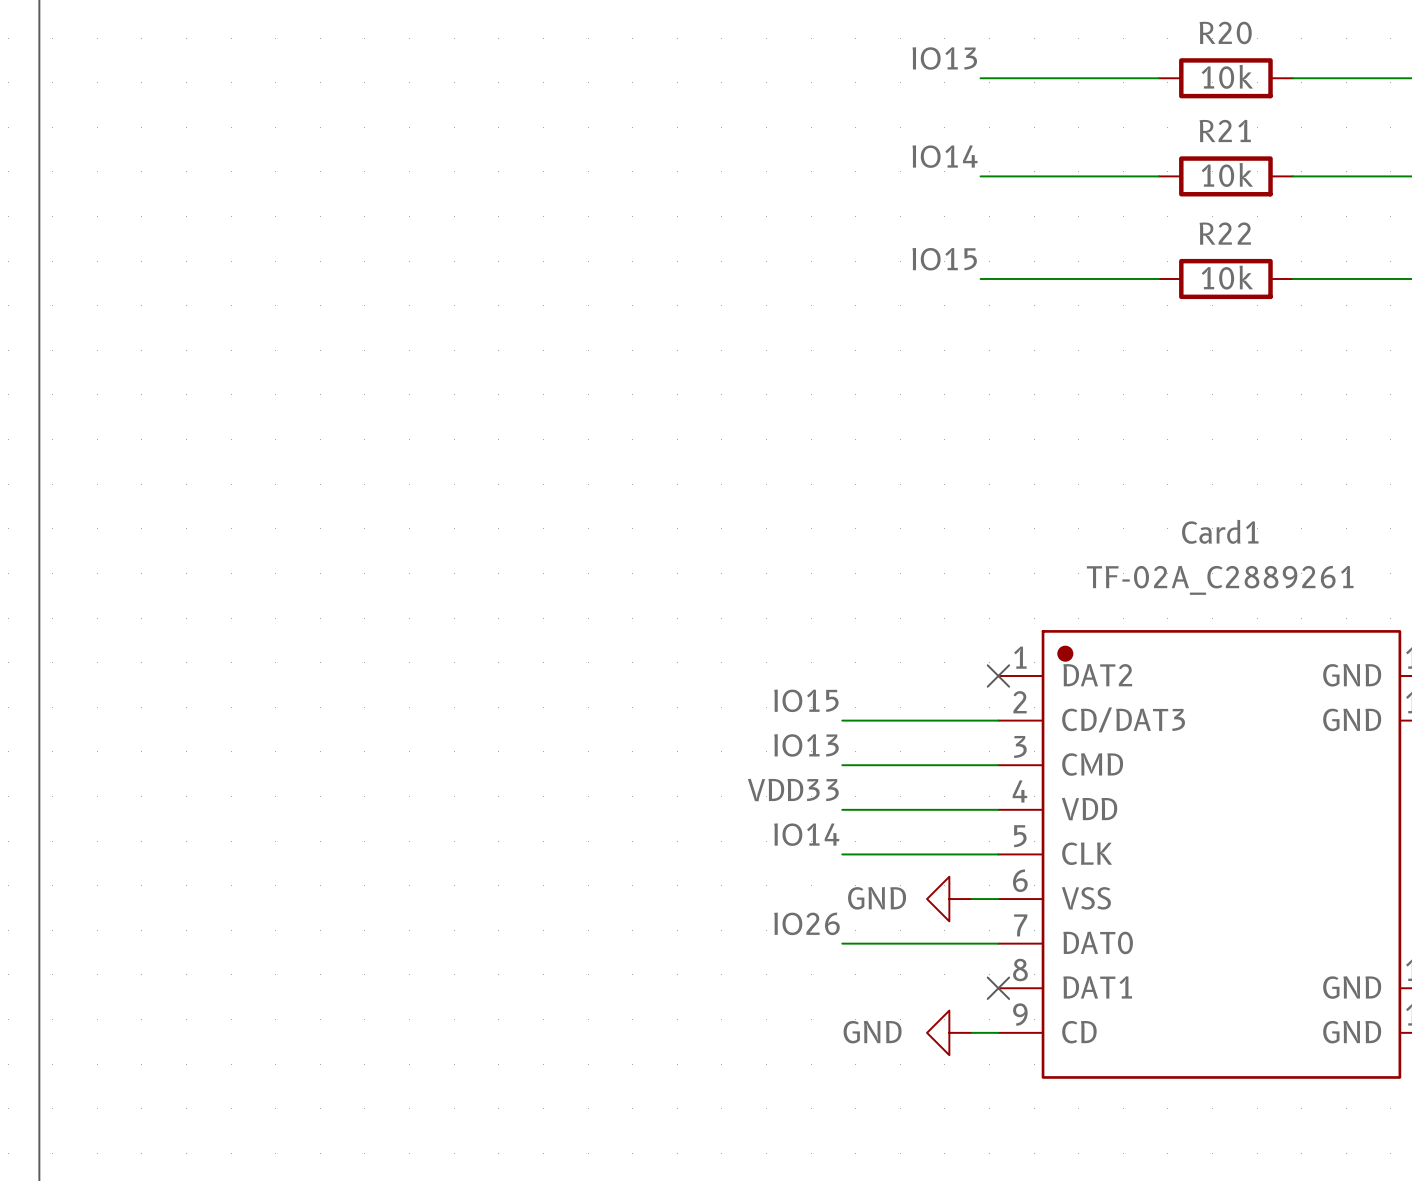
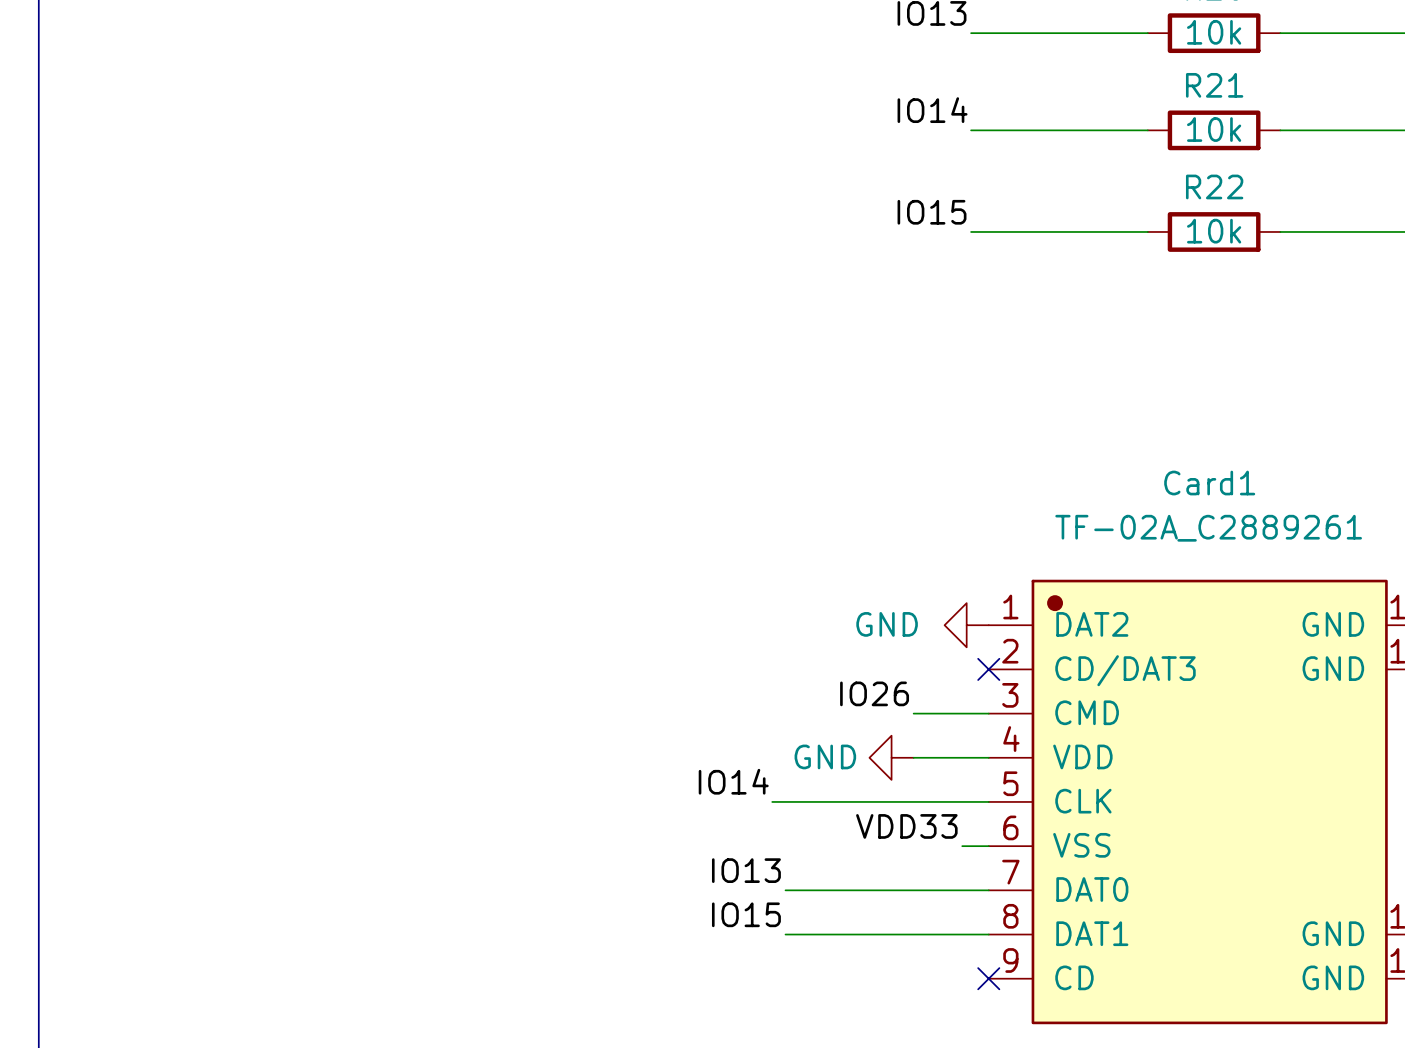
power symbol: none -> GND (966, 625)
no-connect mark position: (998, 676) -> (988, 669)
label position: IO15 (806, 700) -> IO15 (746, 914)
wire: (842, 720) (998, 720) -> none
label position: IO13 (806, 745) -> IO13 (746, 870)
wire: (842, 765) (922, 765) -> none
label position: VDD33 (793, 790) -> VDD33 (906, 826)
wire: (842, 809) (922, 809) -> none
label position: IO14 (806, 834) -> IO14 (733, 781)
wire: none -> (772, 801) (834, 801)
power symbol position: GND (949, 899) -> GND (891, 757)
label position: IO26 (806, 923) -> IO26 (874, 693)
wire: none -> (785, 890) (834, 890)
wire: none -> (785, 934) (988, 934)
no-connect mark position: (998, 988) -> (988, 978)
power symbol: GND (949, 1032) -> none
wire: (971, 1032) (998, 1032) -> none

